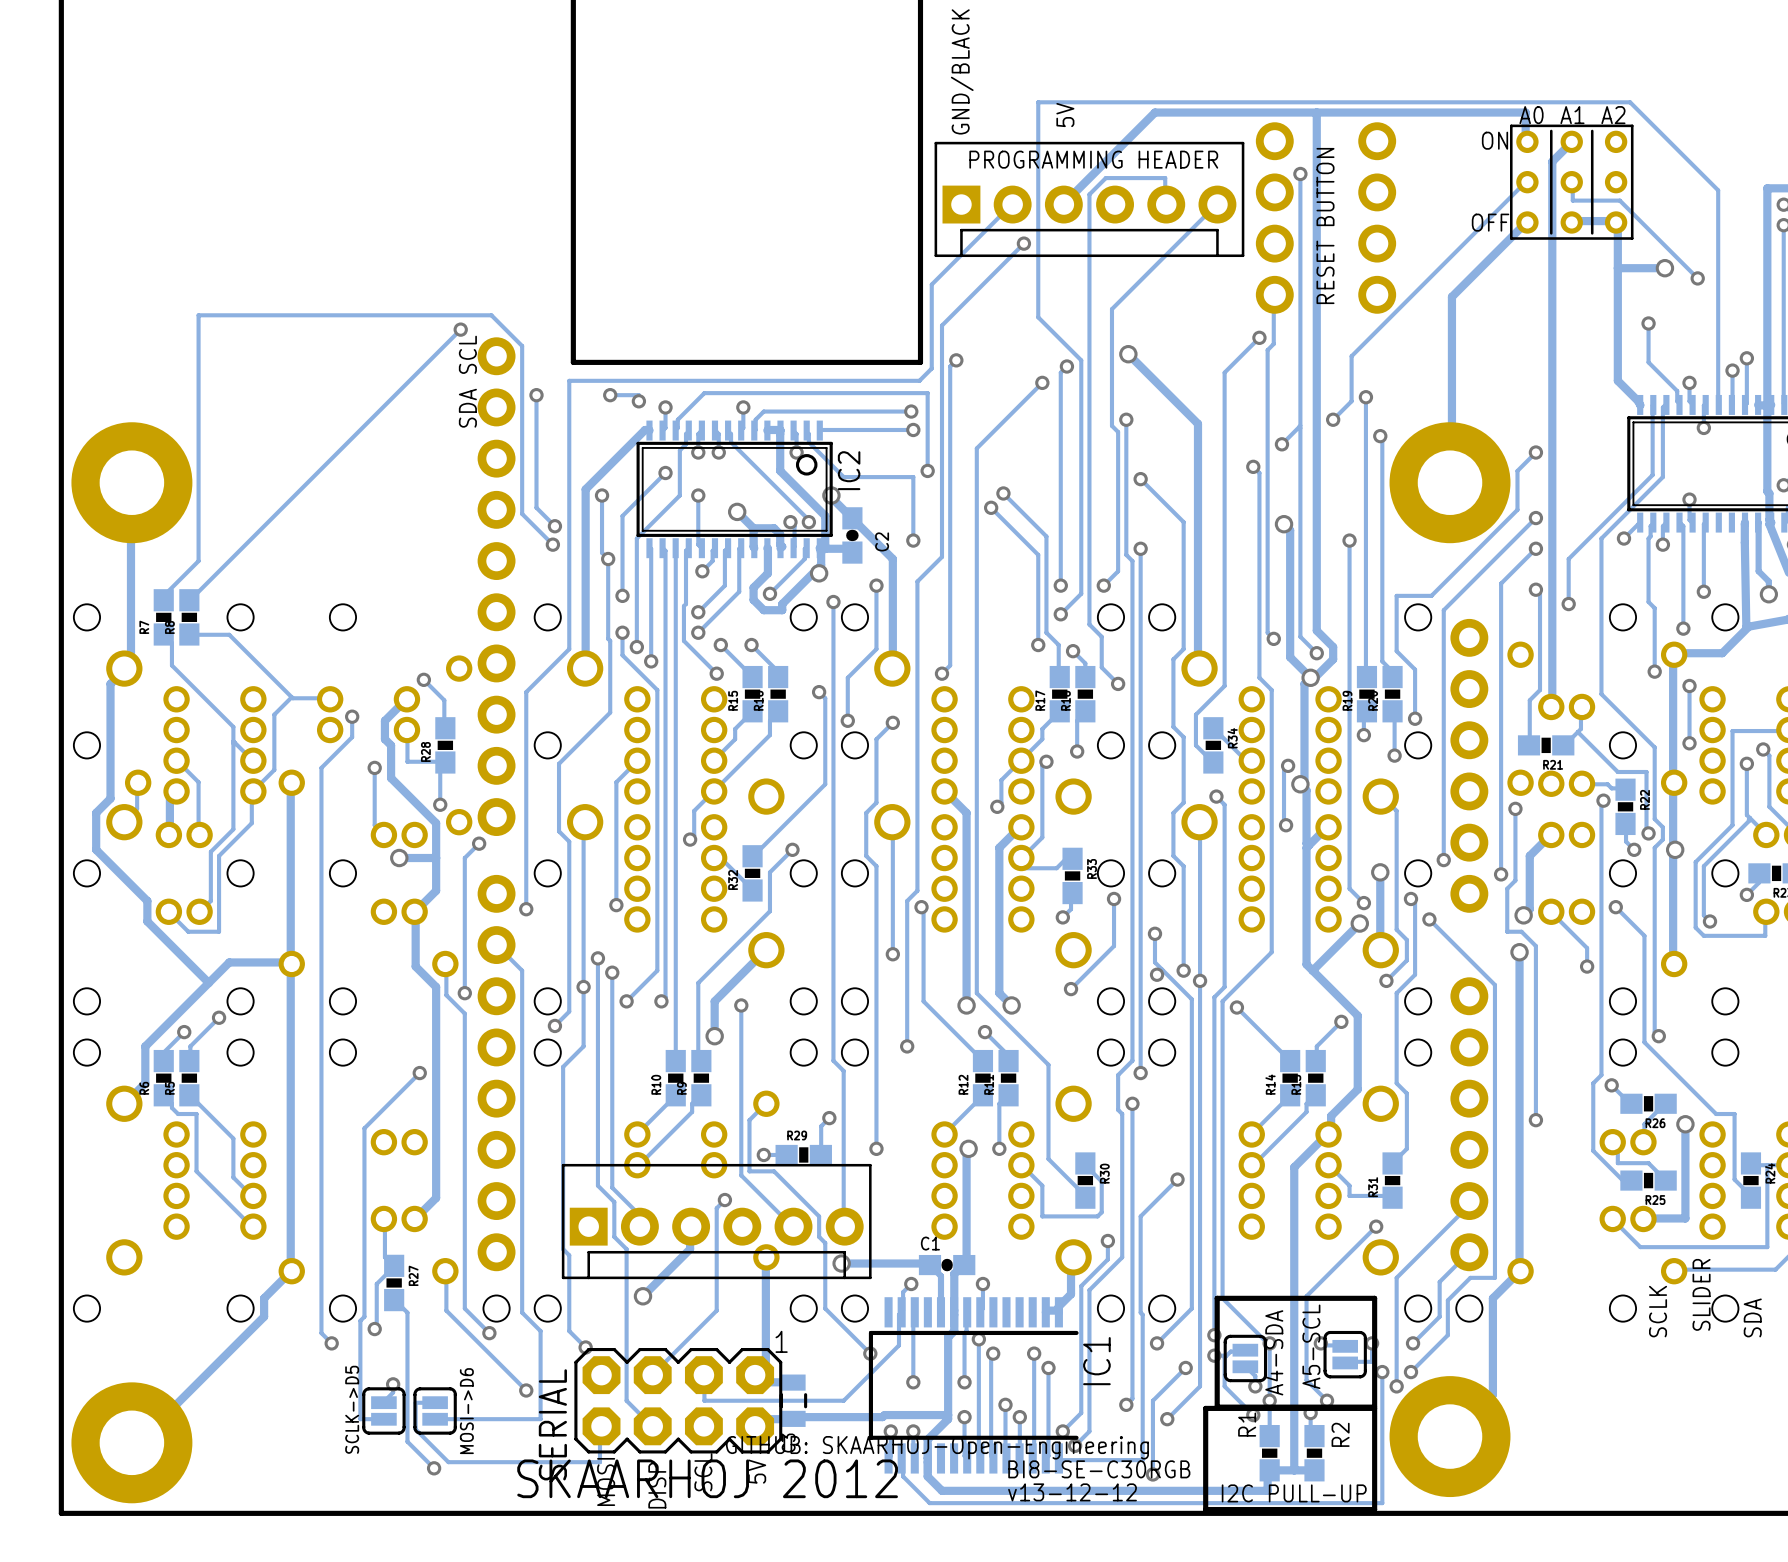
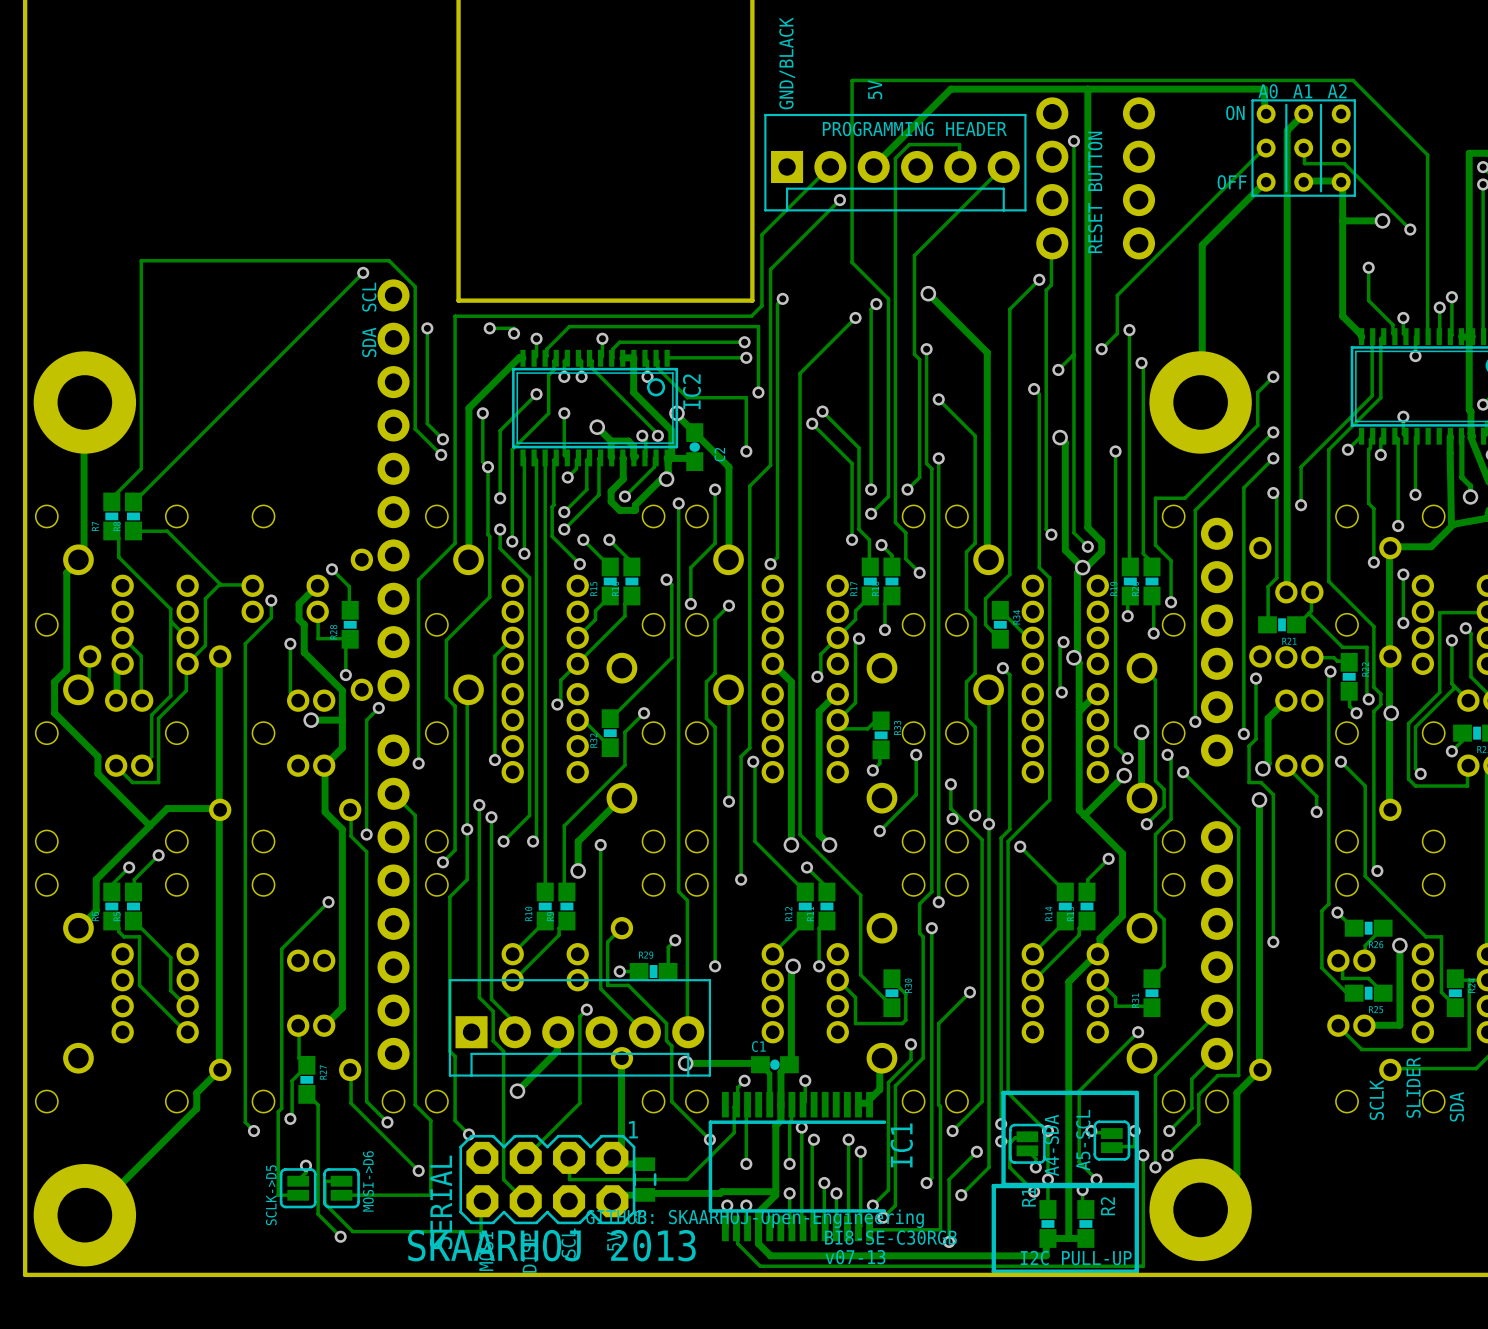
text: SKAARHOJ 2012 (707, 1478) -> SKAARHOJ 2013 (551, 1245)
text: v13-12-12 (1072, 1492) -> v07-13 (855, 1257)

